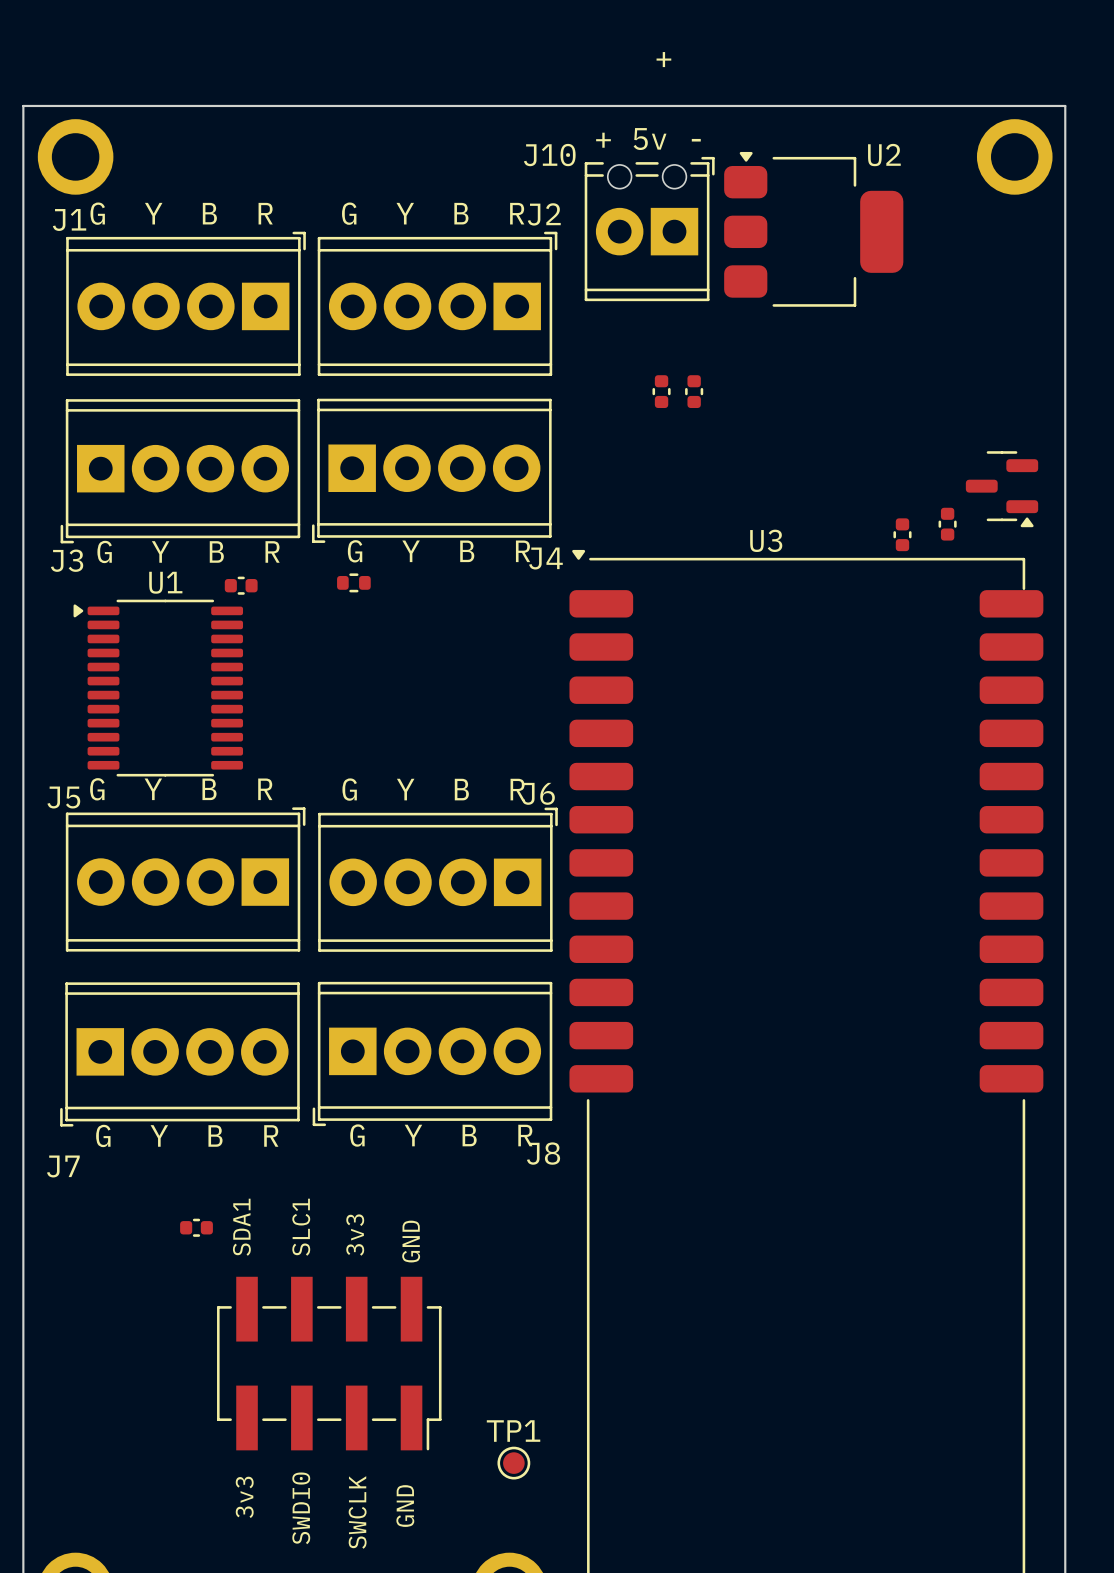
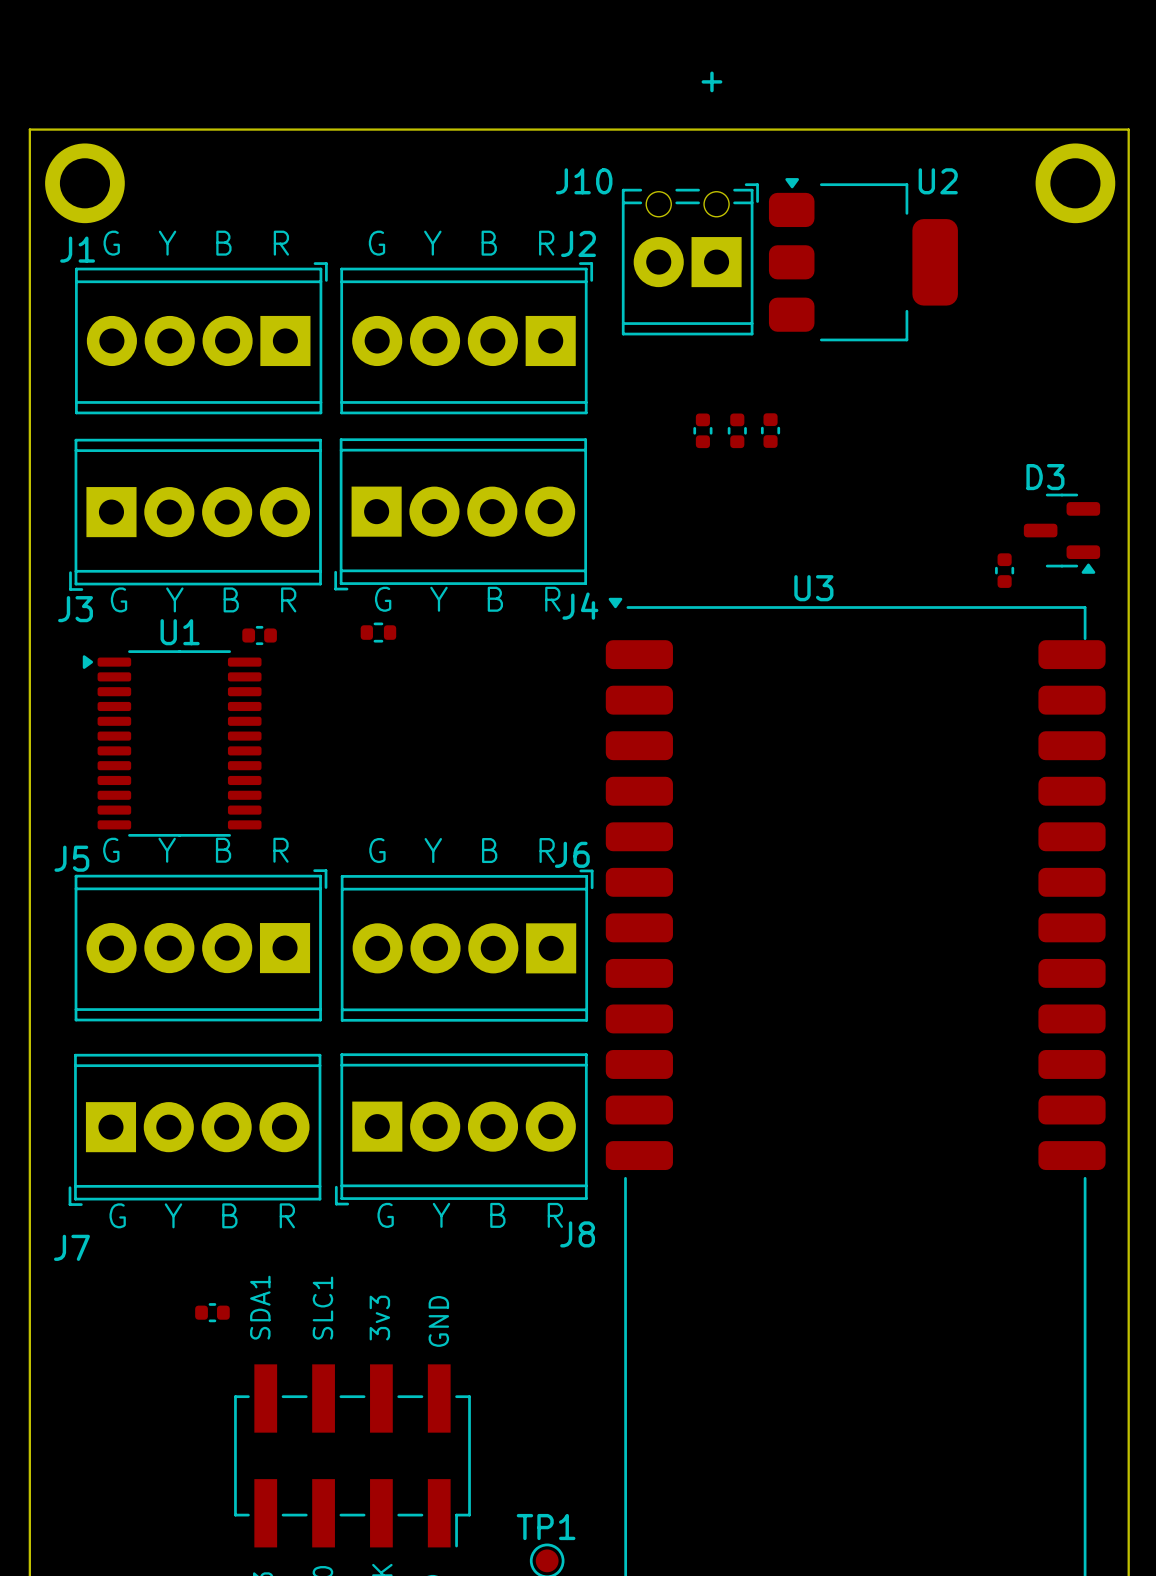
J10 text: + 5v - (648, 139) -> none
D3 name: none -> D3 (1045, 477)
part position: (902, 534) -> (770, 430)

